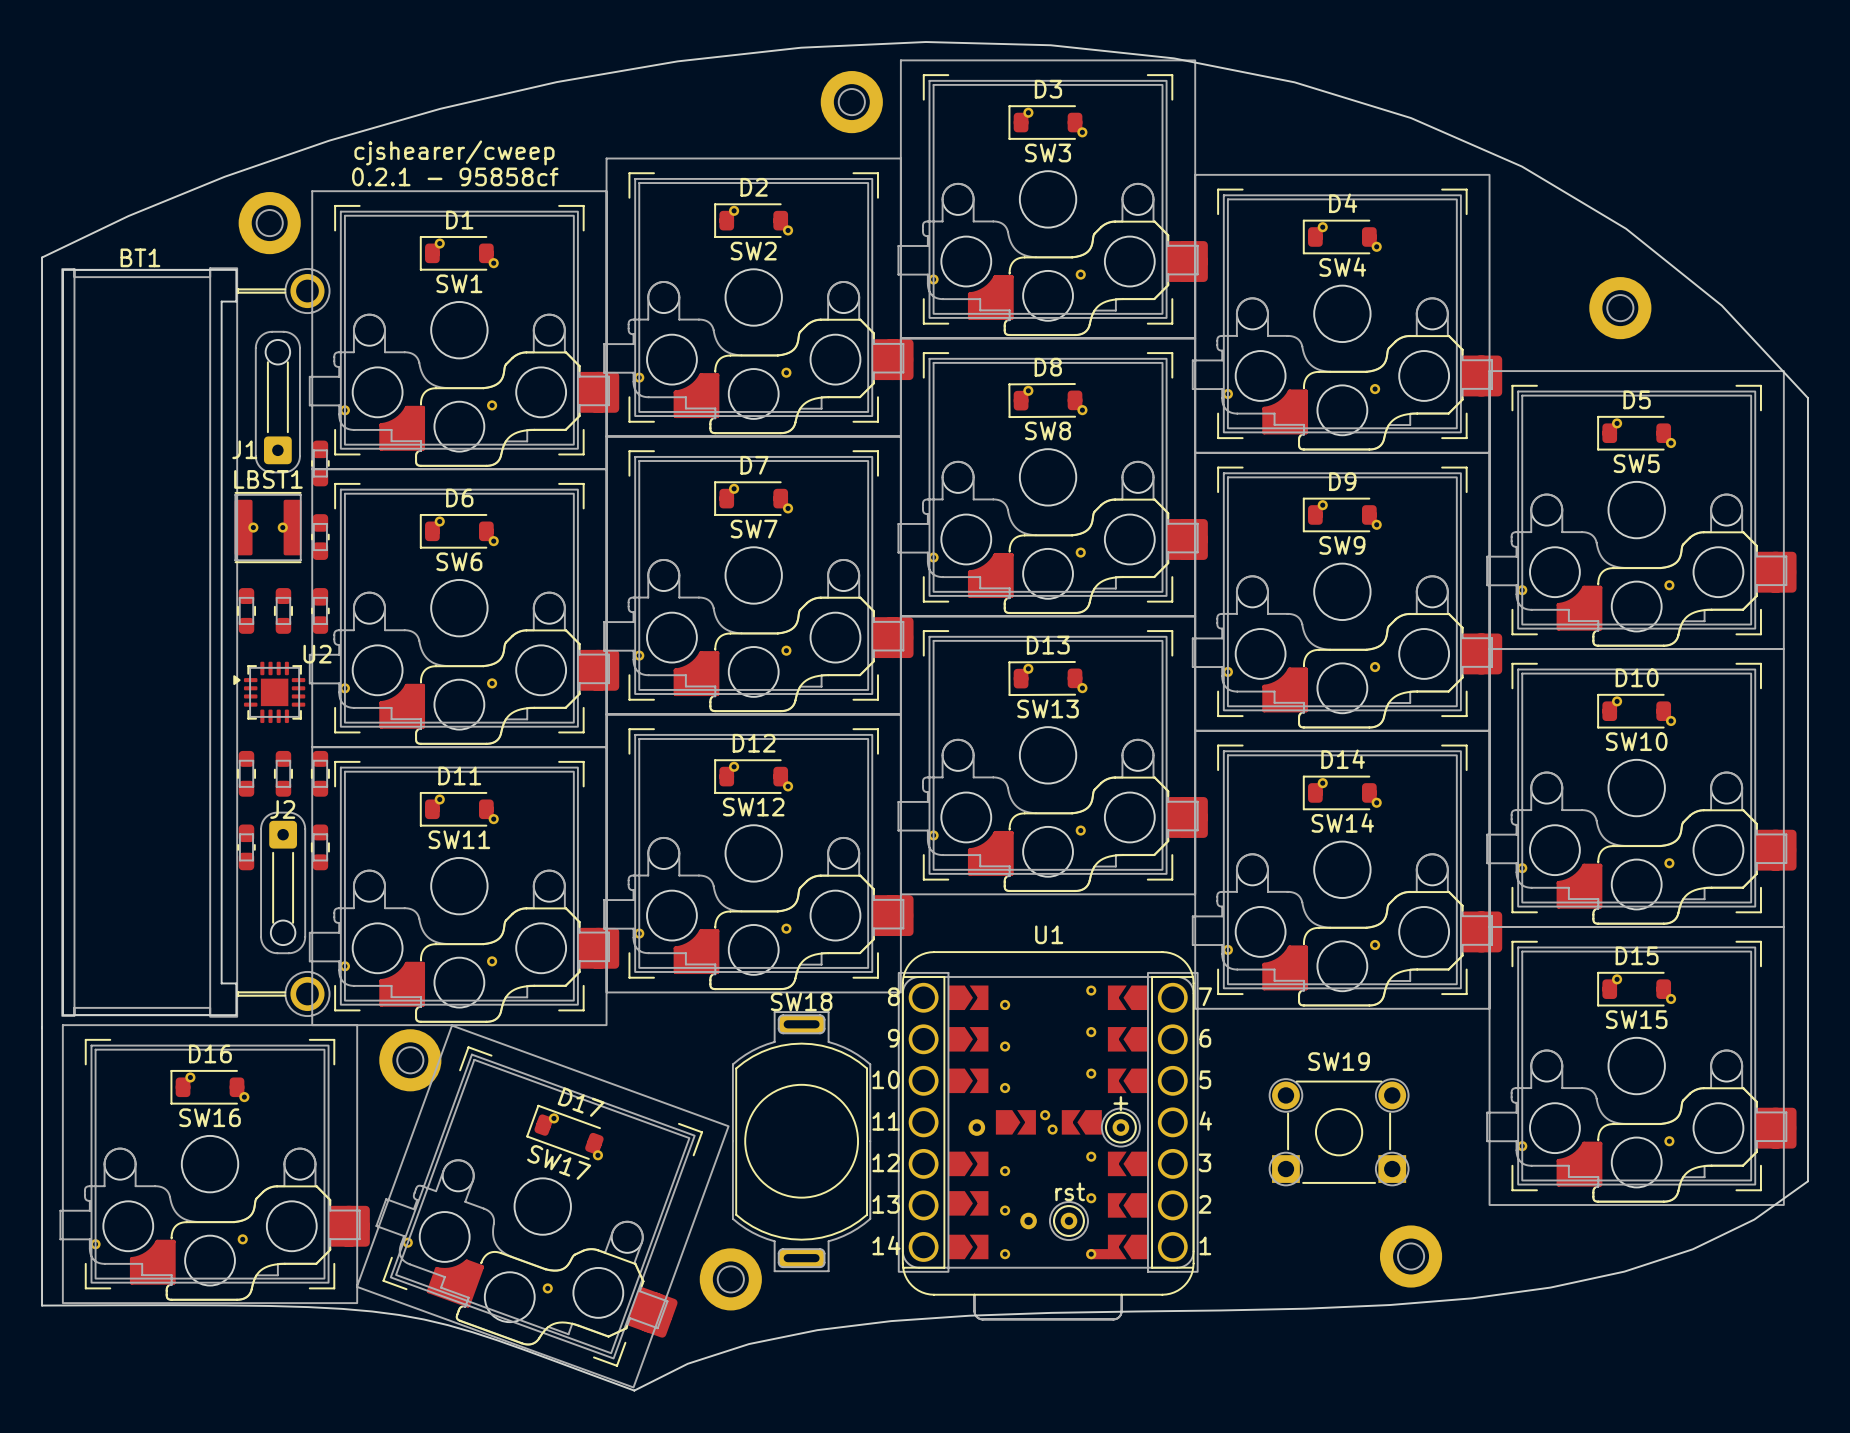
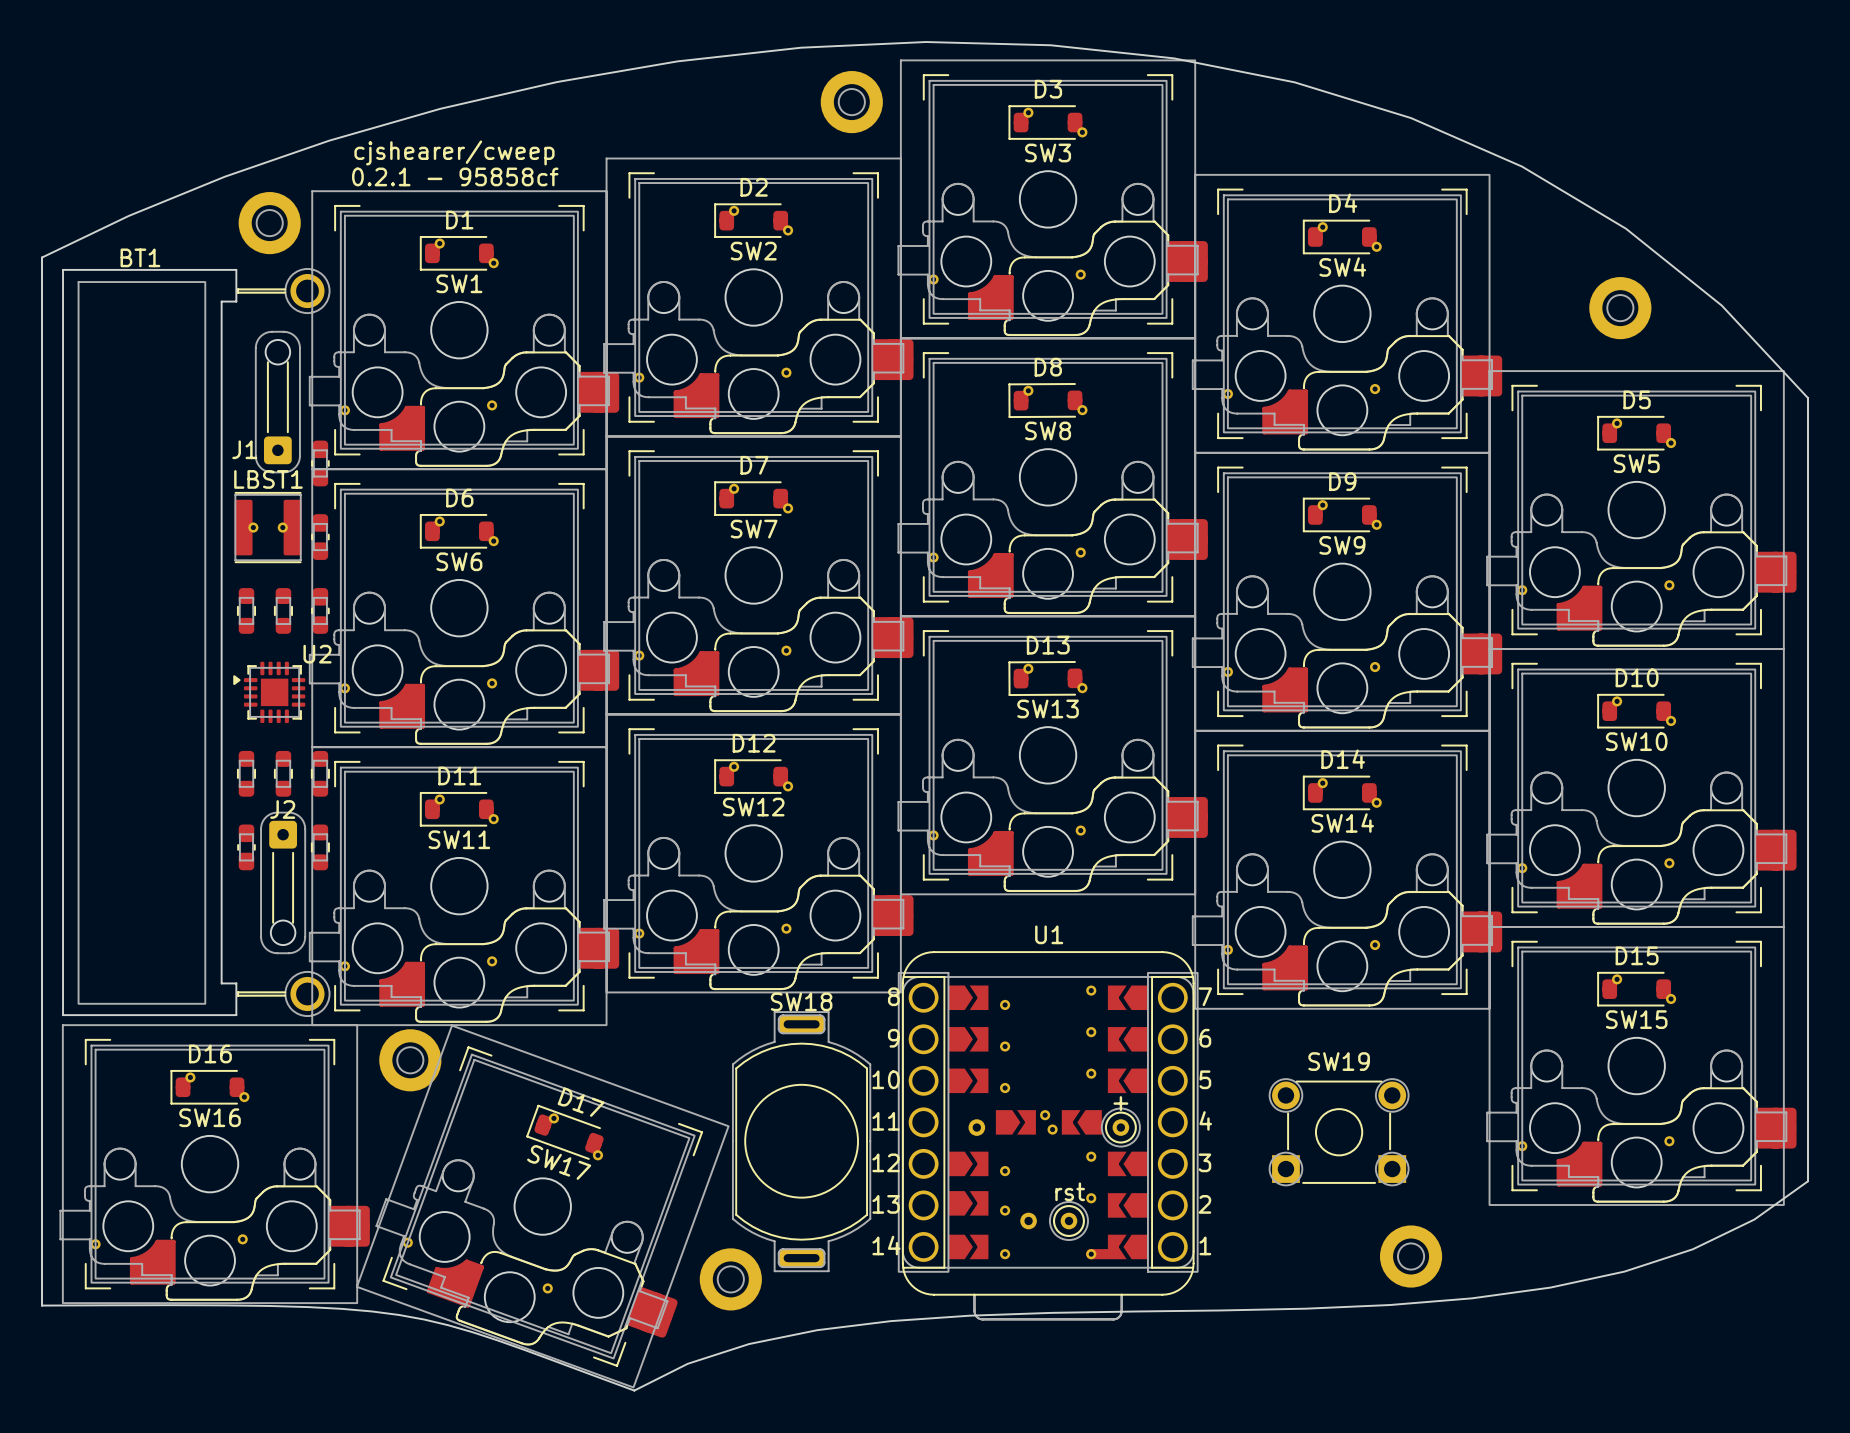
BT1 footprint: [61, 267, 330, 1018] -> [62, 268, 330, 1017]

